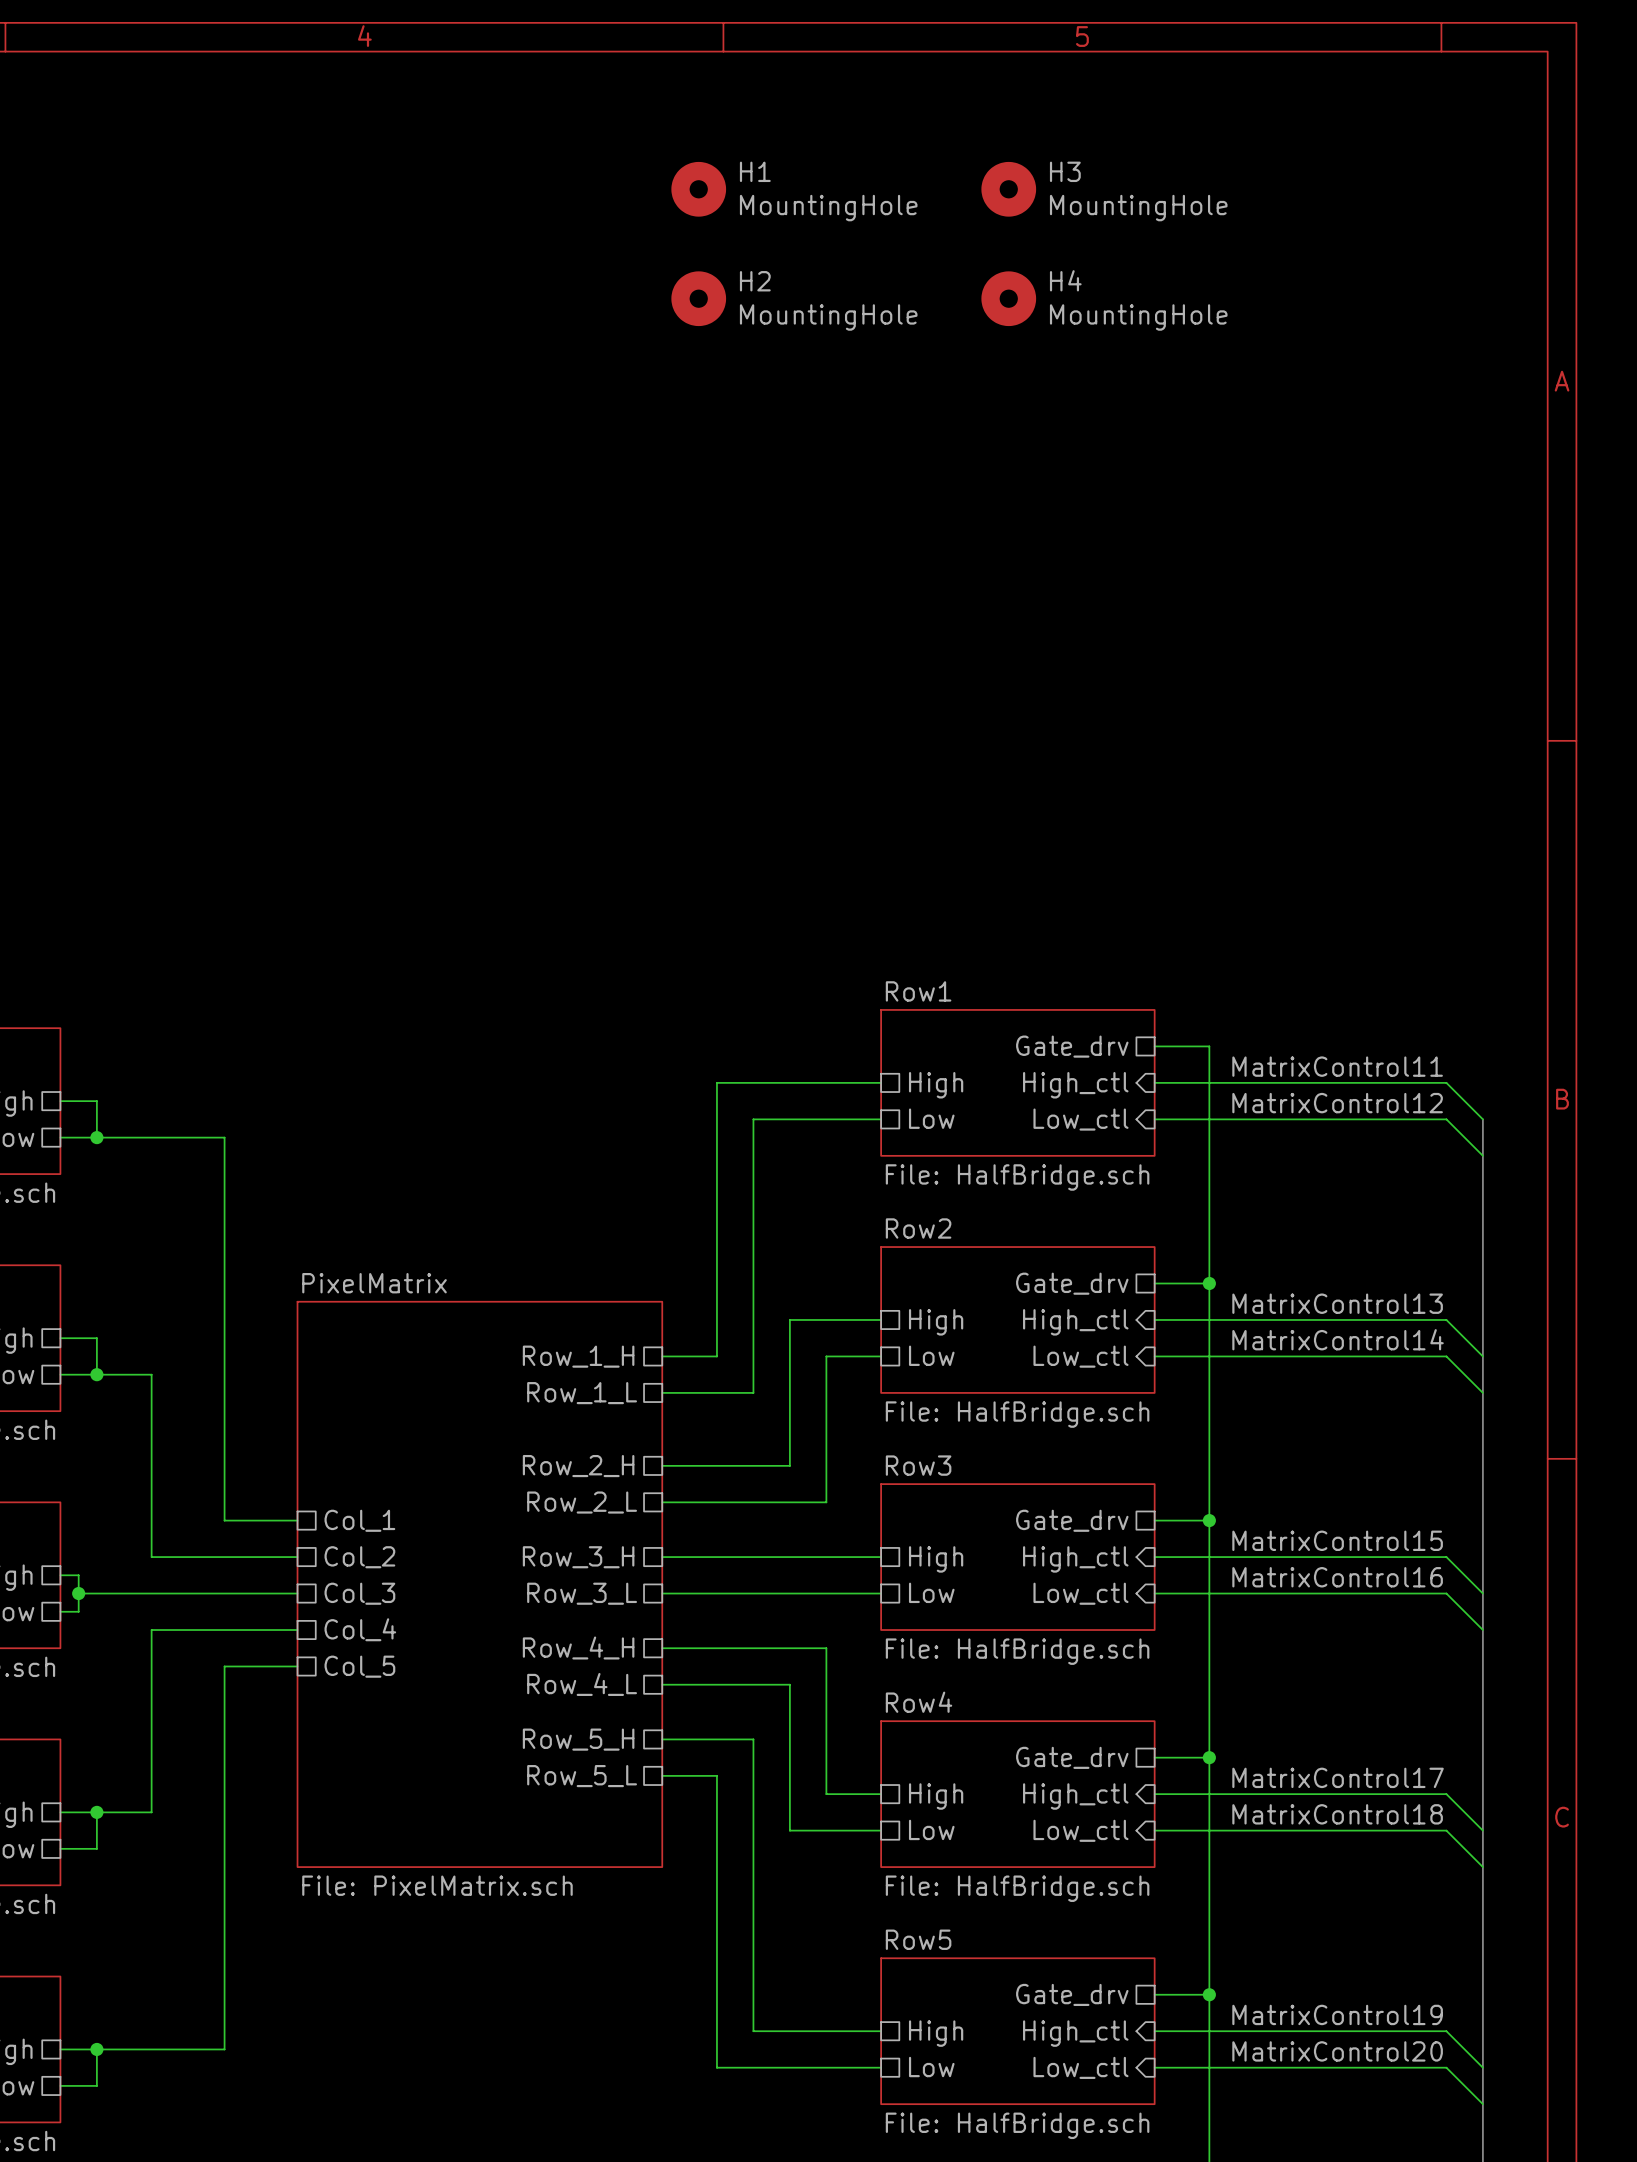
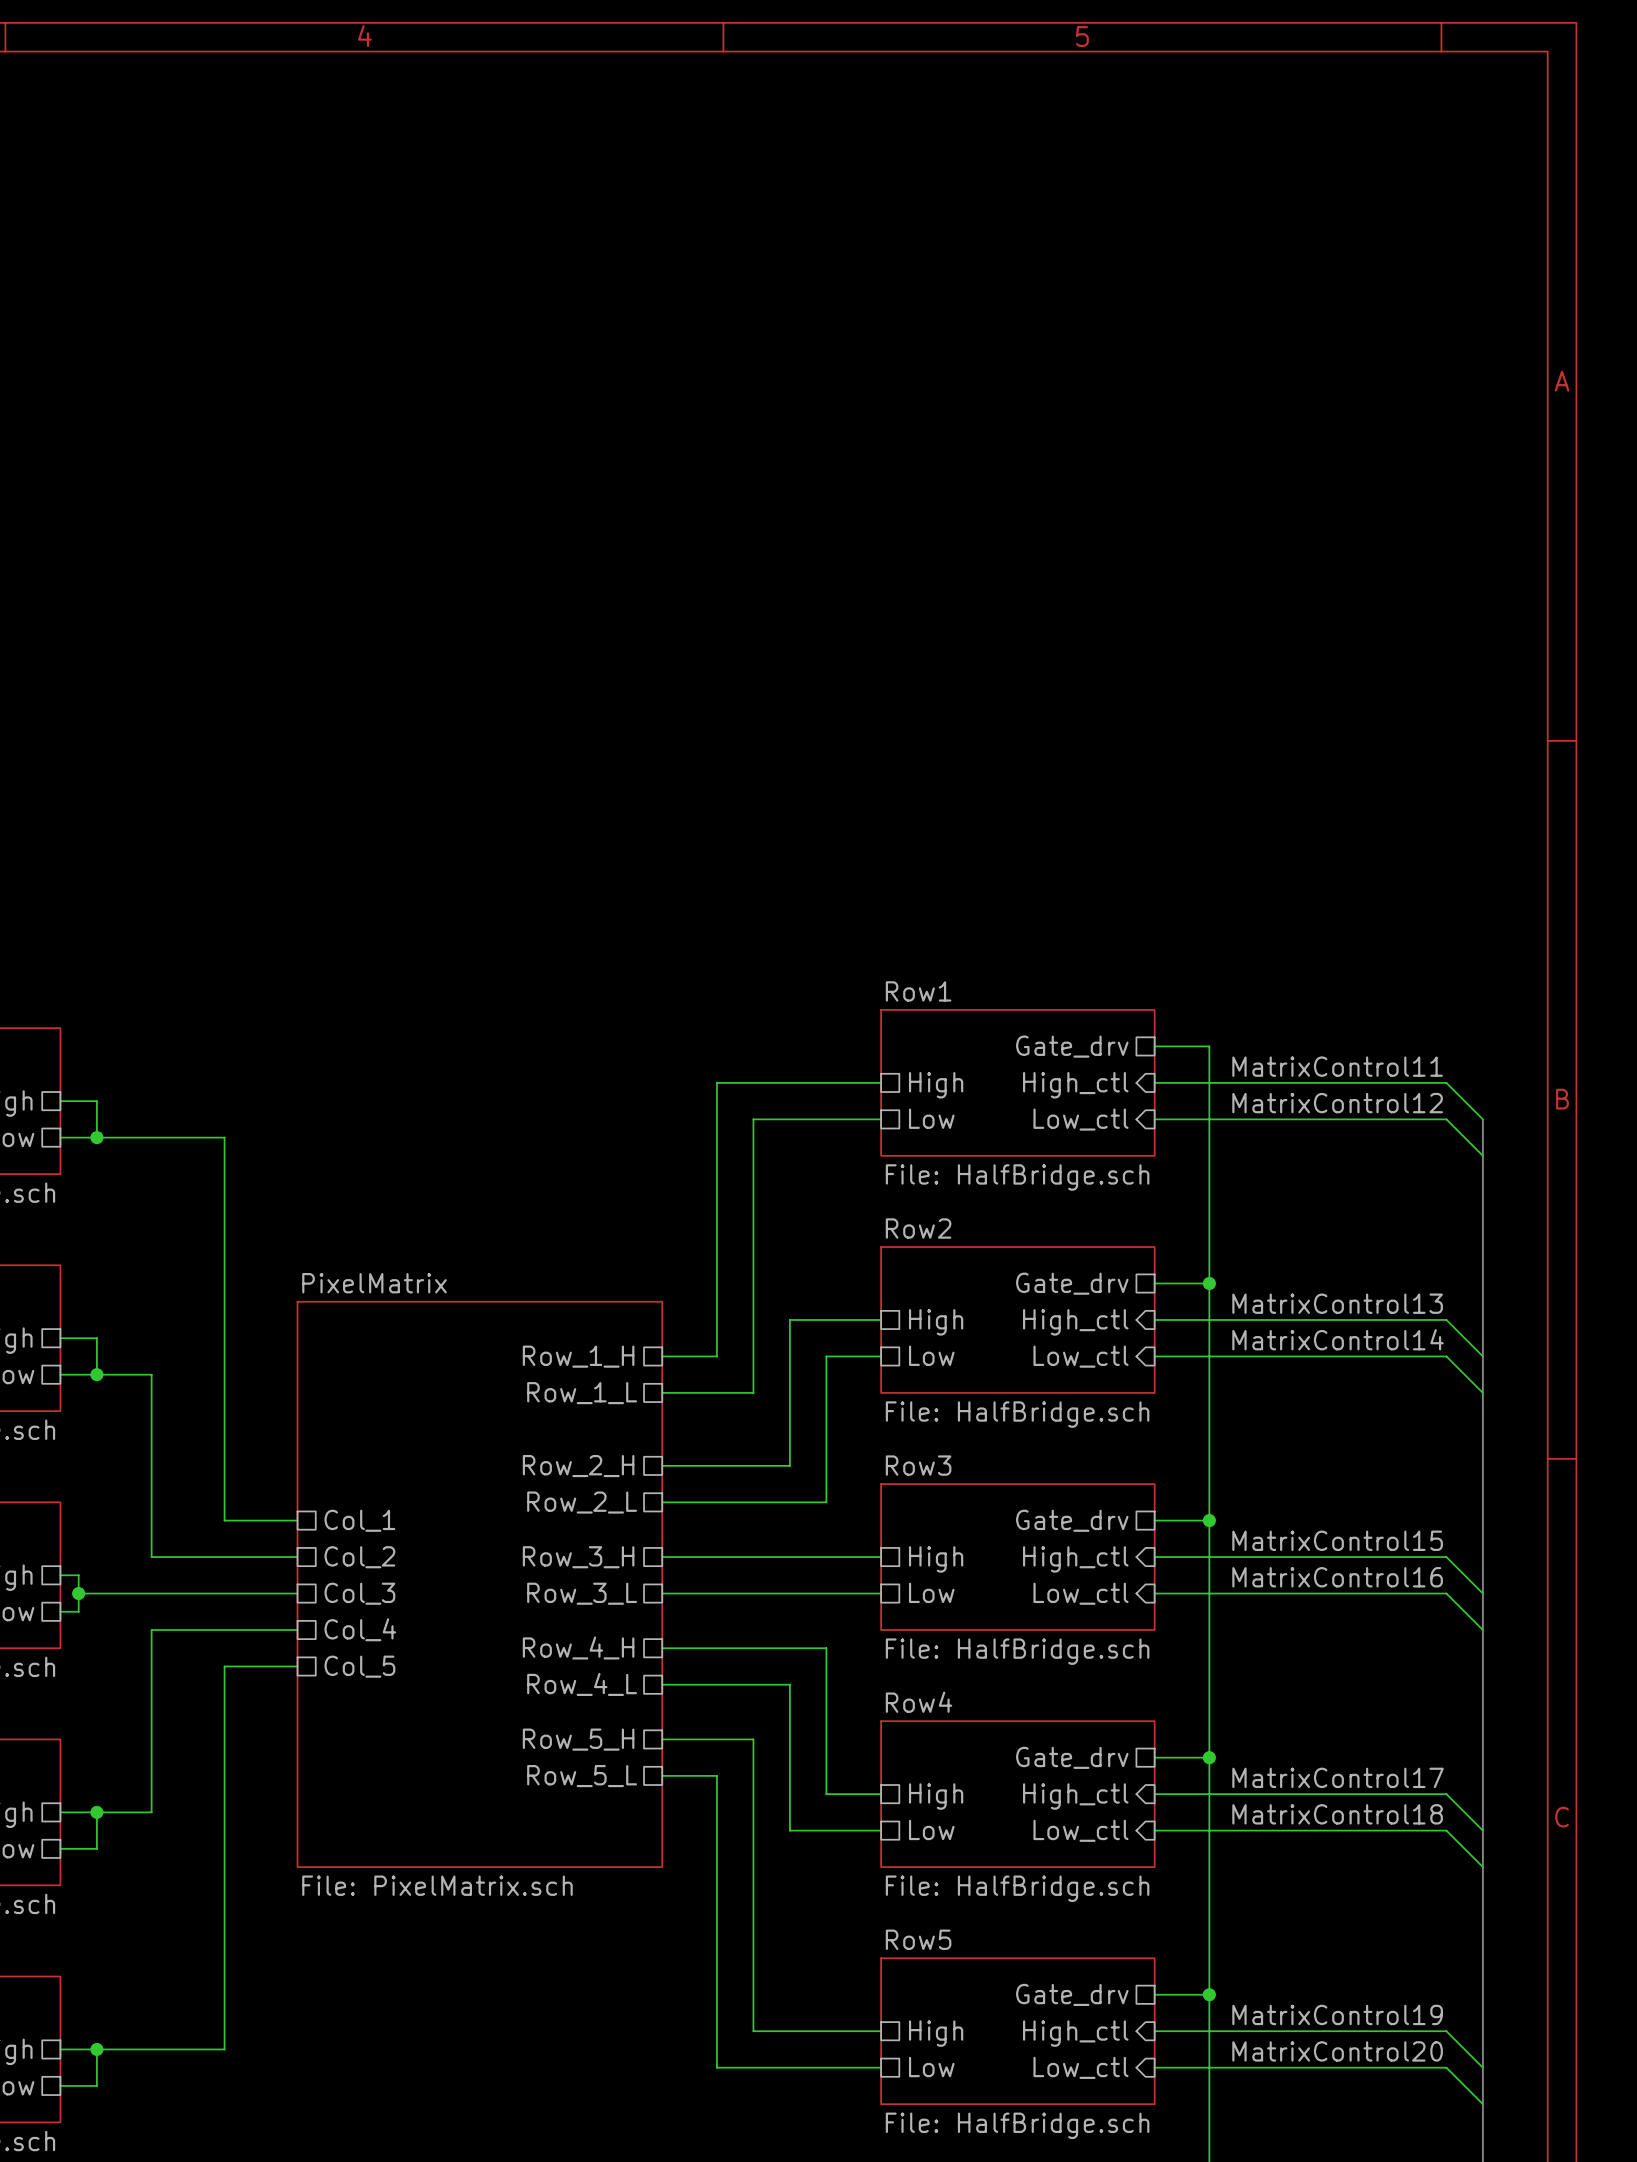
H1: MountingHole (698, 189) -> none
H3: MountingHole (1008, 189) -> none
H2: MountingHole (698, 298) -> none
H4: MountingHole (1008, 298) -> none

